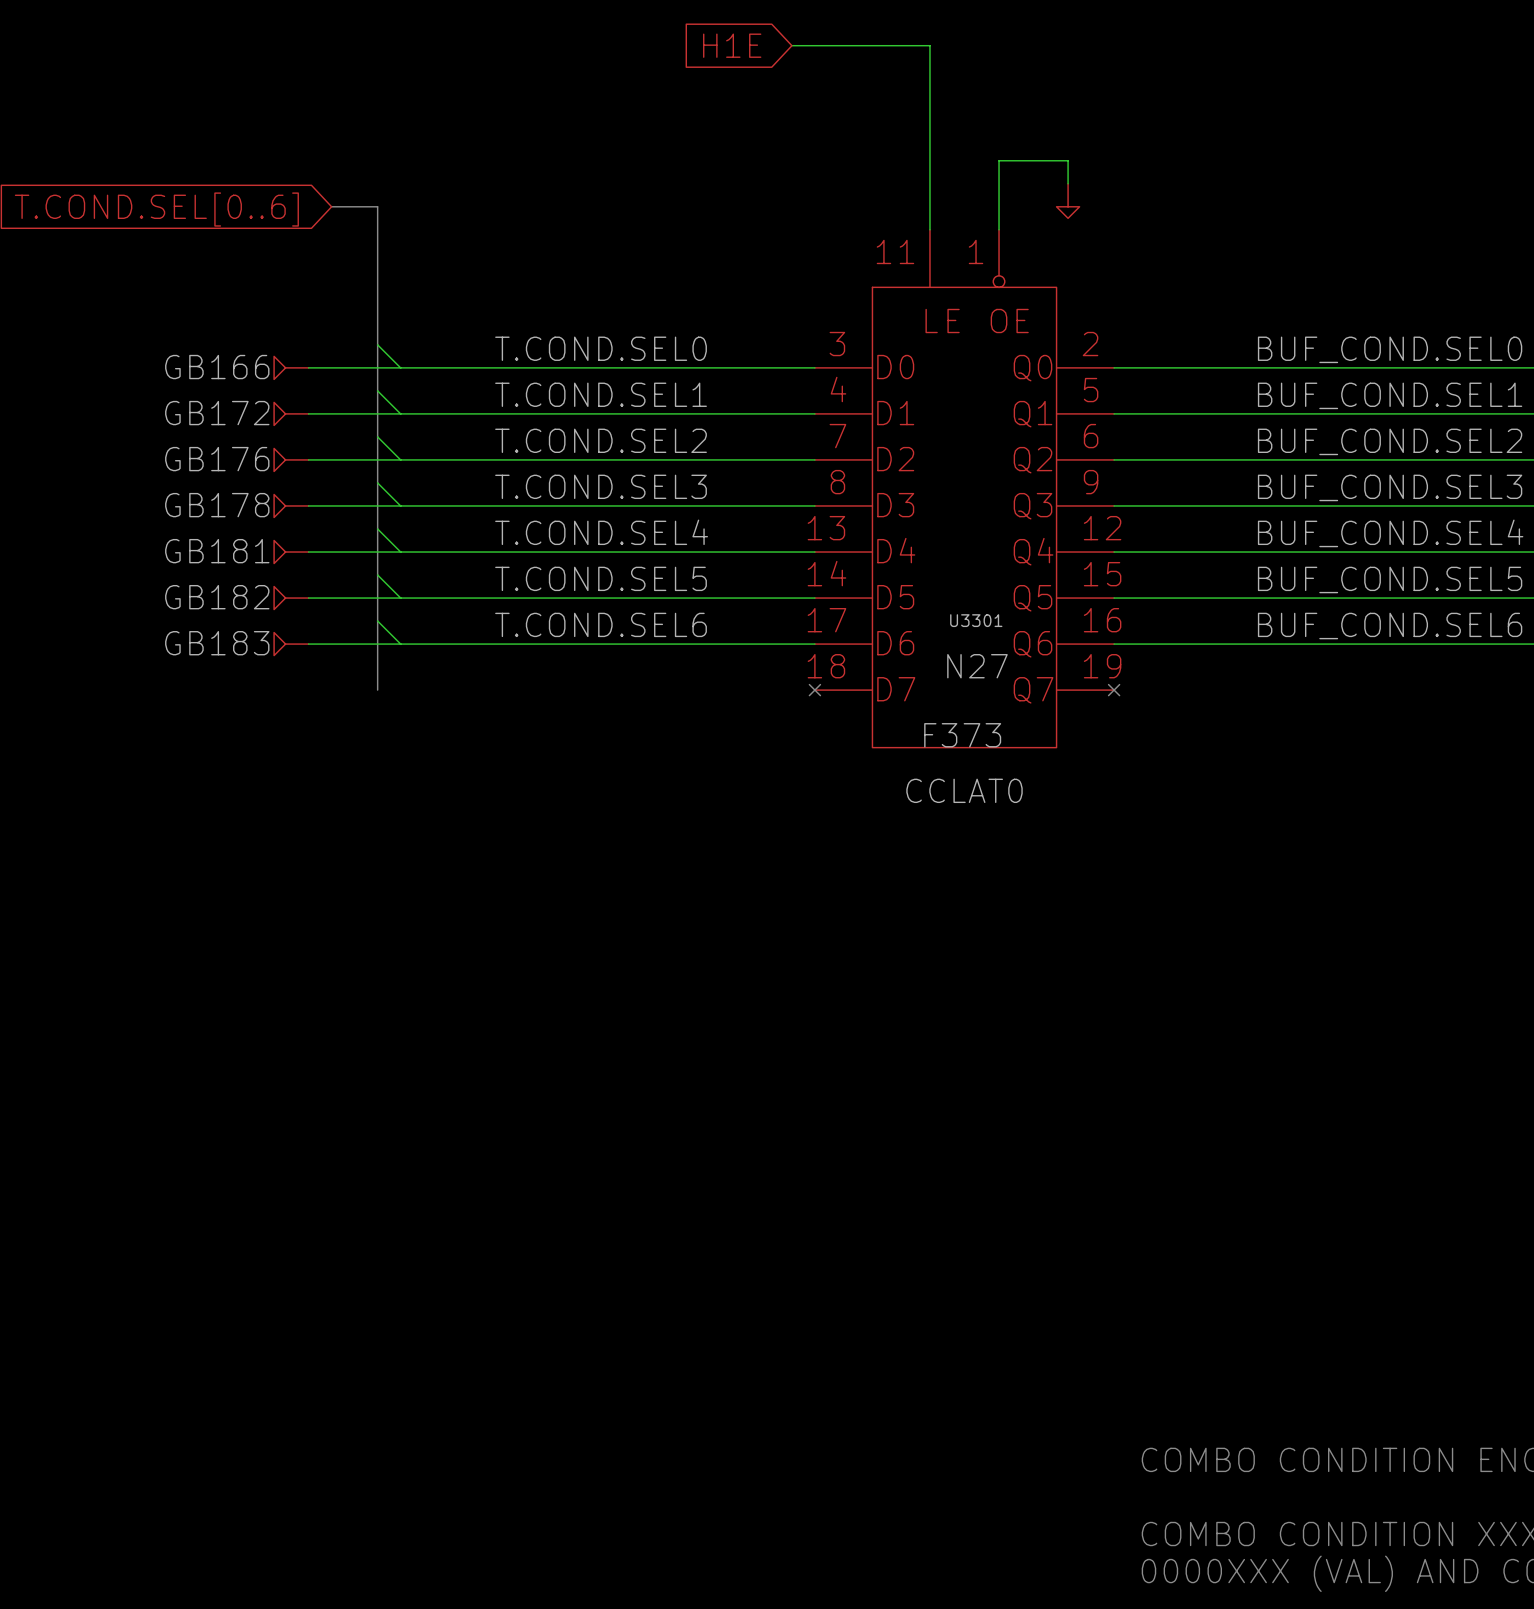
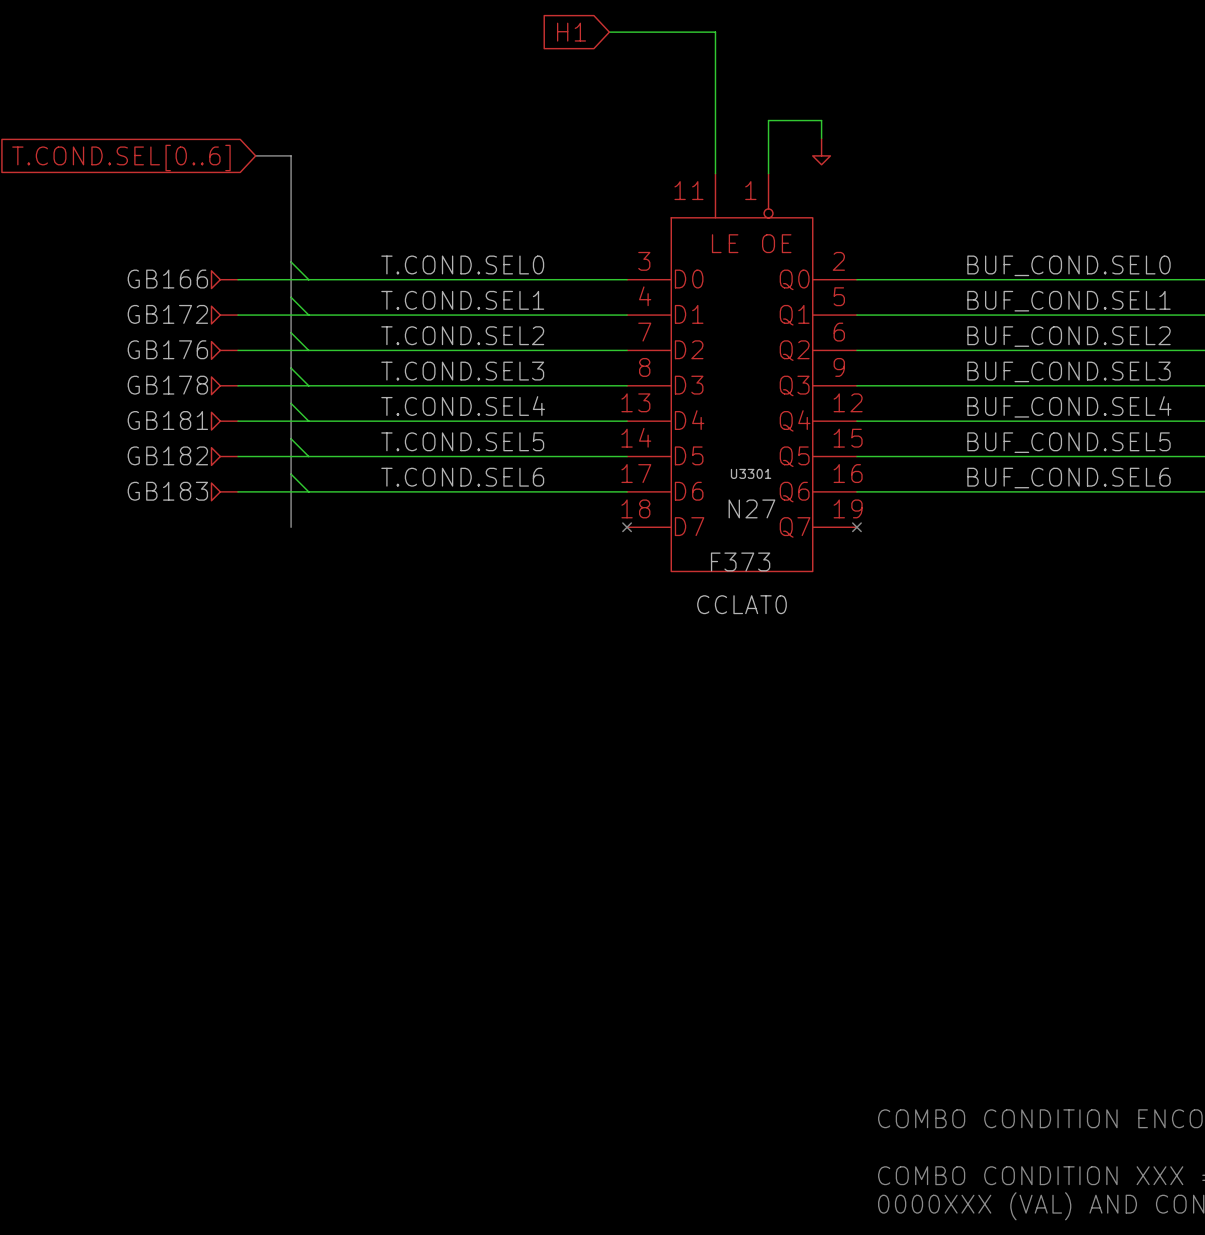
global label: H1E (732, 45) -> H1 (571, 32)

